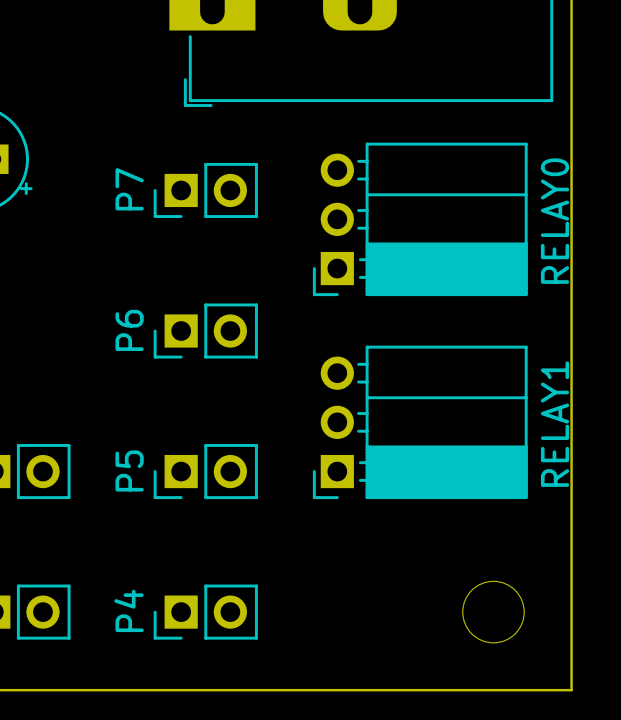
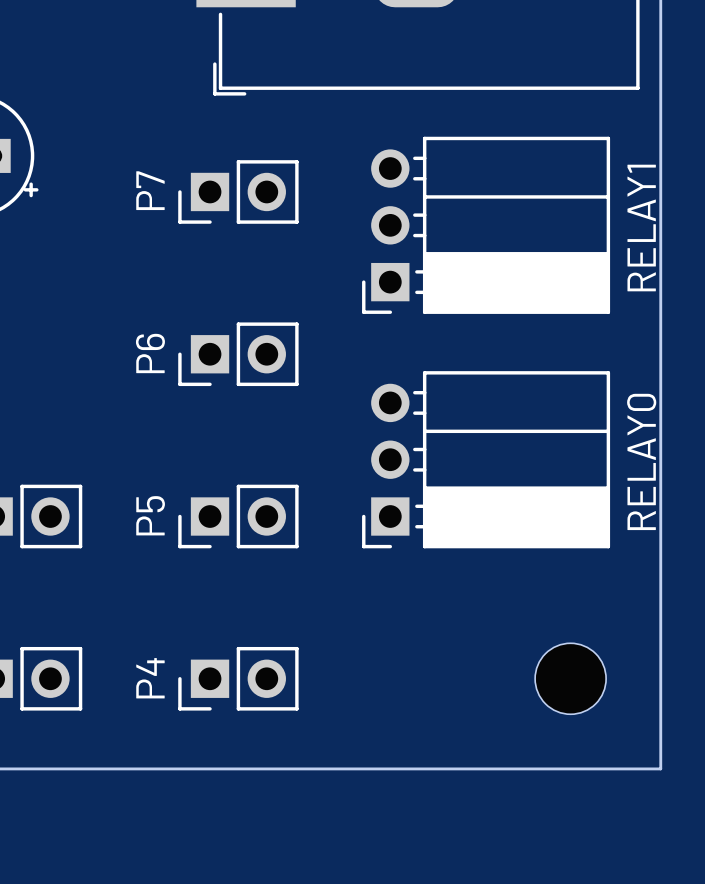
RELAY0 name: RELAY0 (555, 221) -> RELAY1 (641, 228)
RELAY1 name: RELAY1 (555, 424) -> RELAY0 (641, 461)

